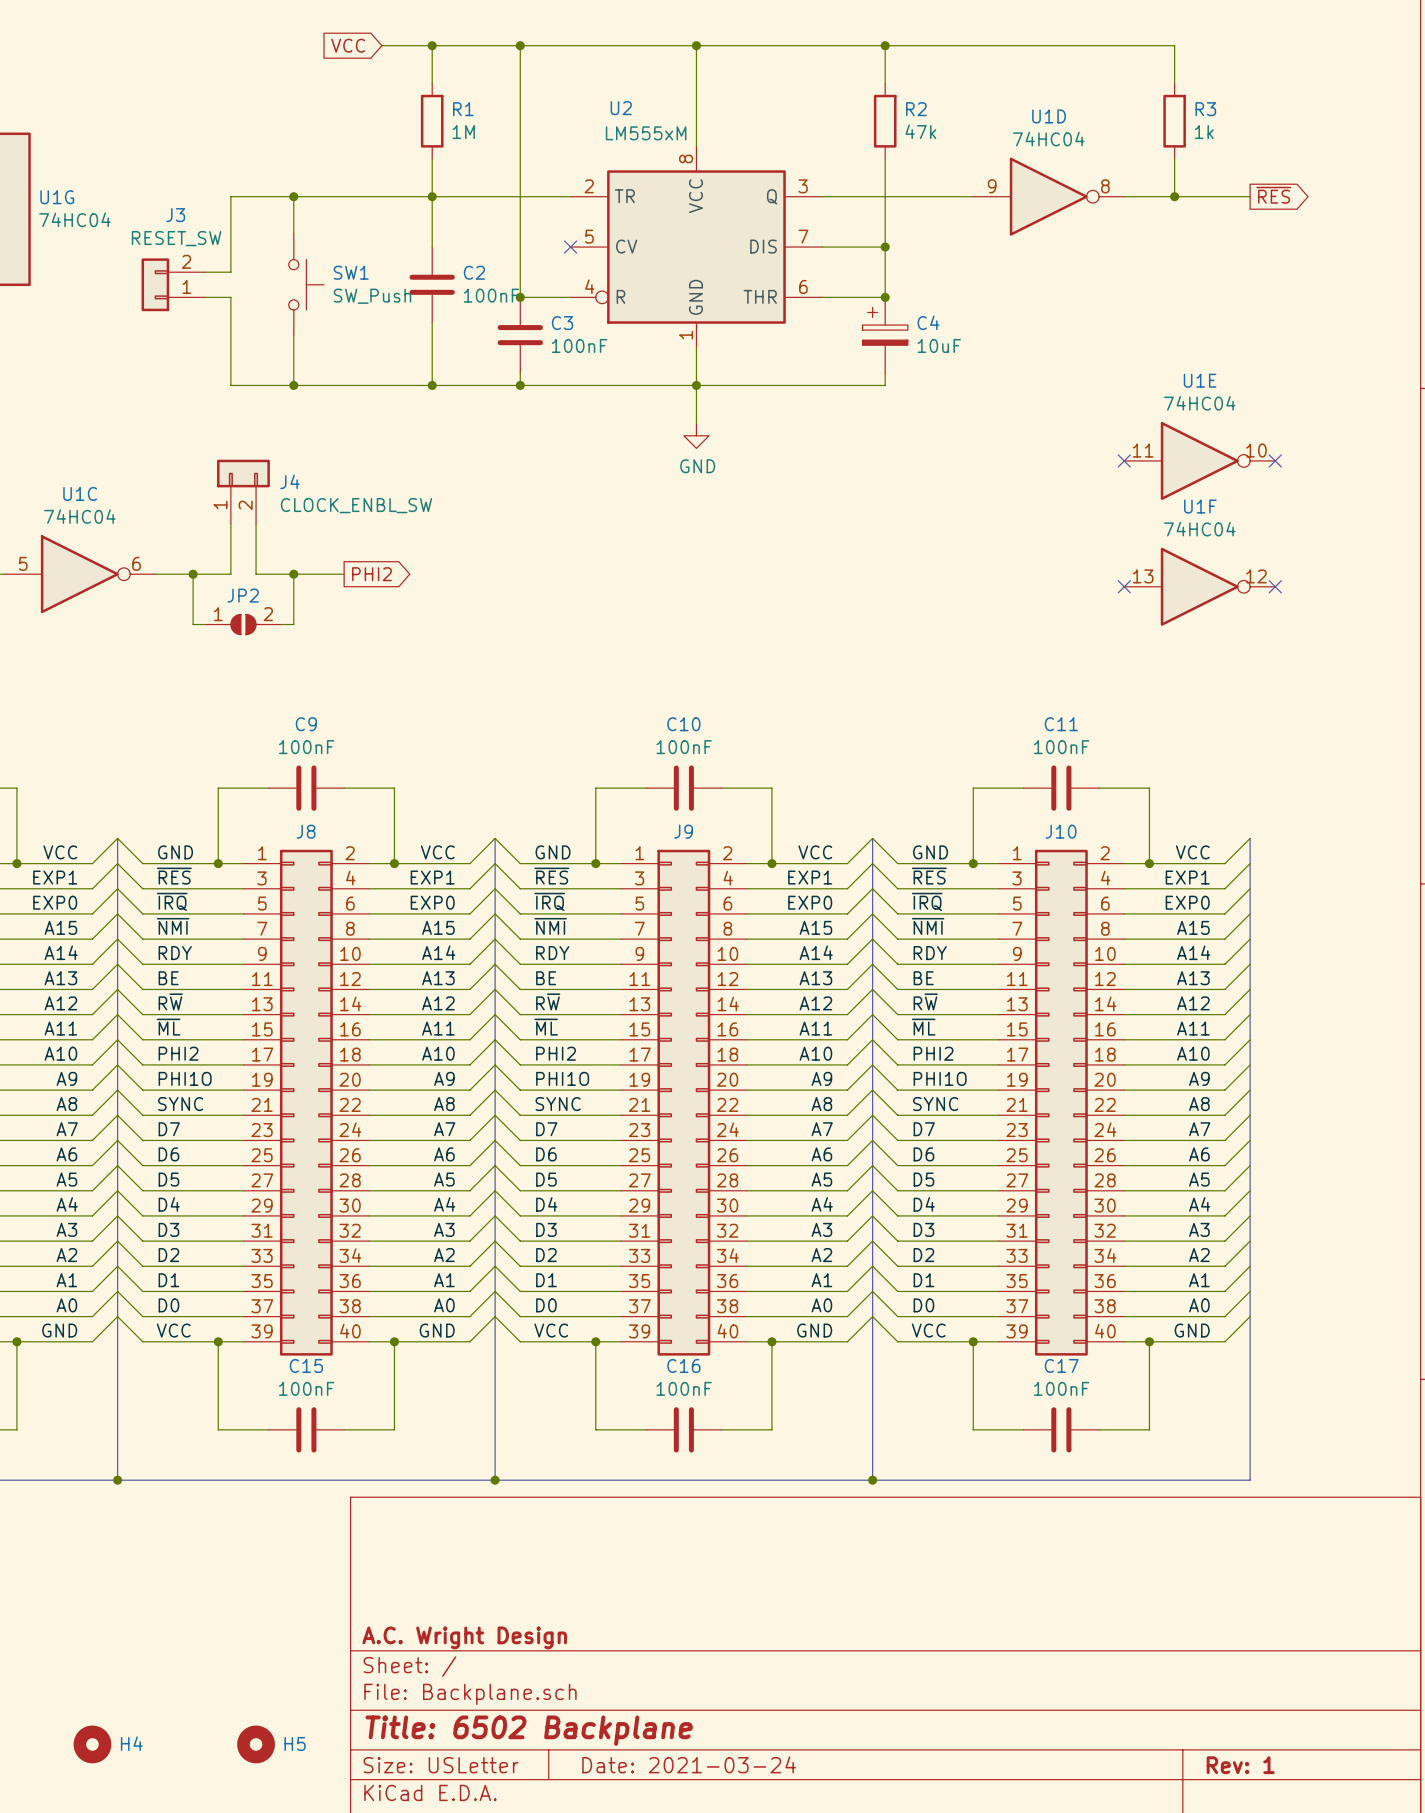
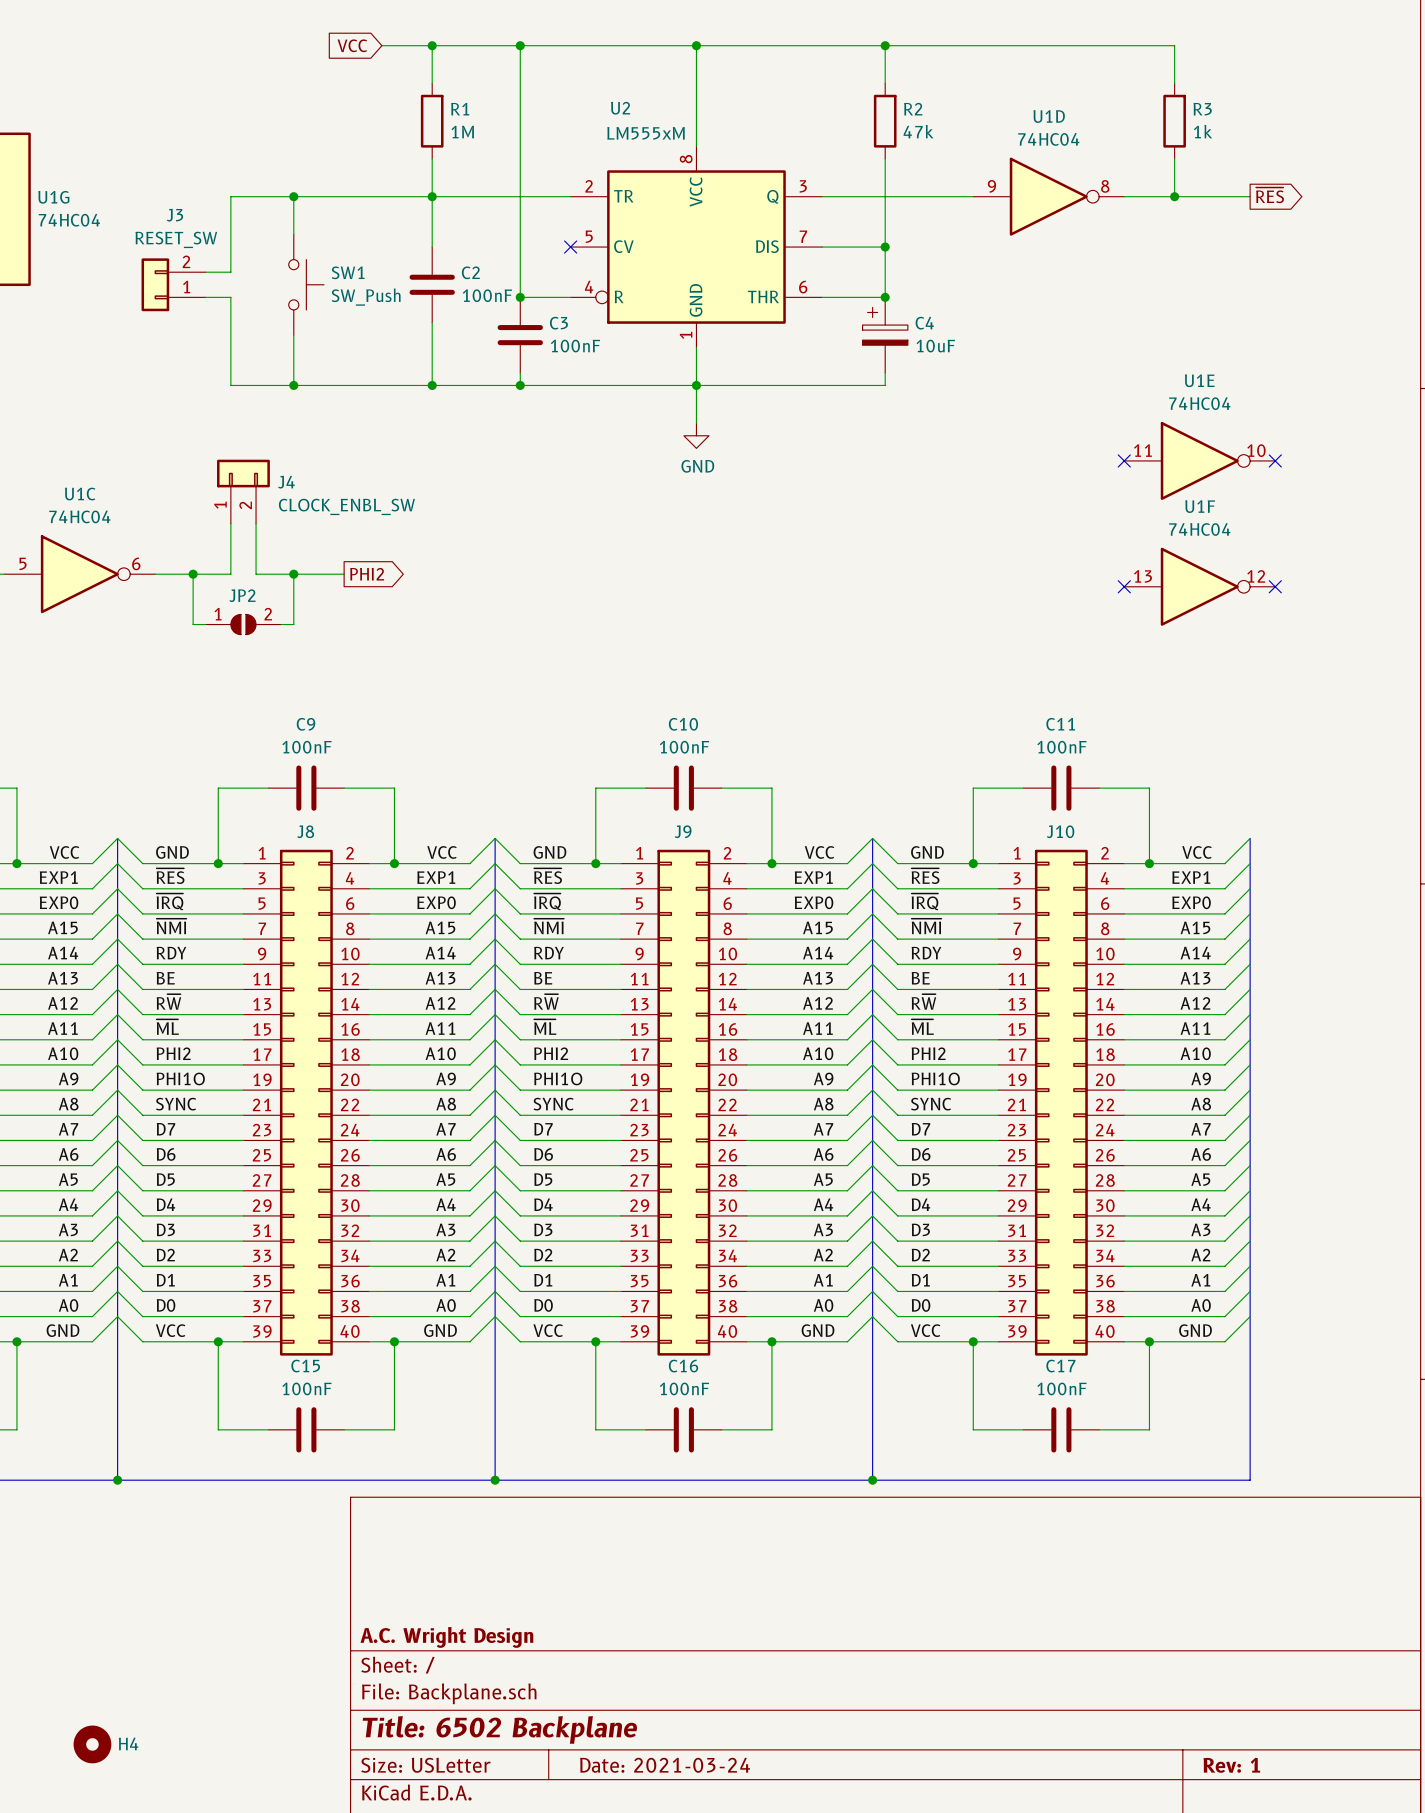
H5: (256, 1744) -> none

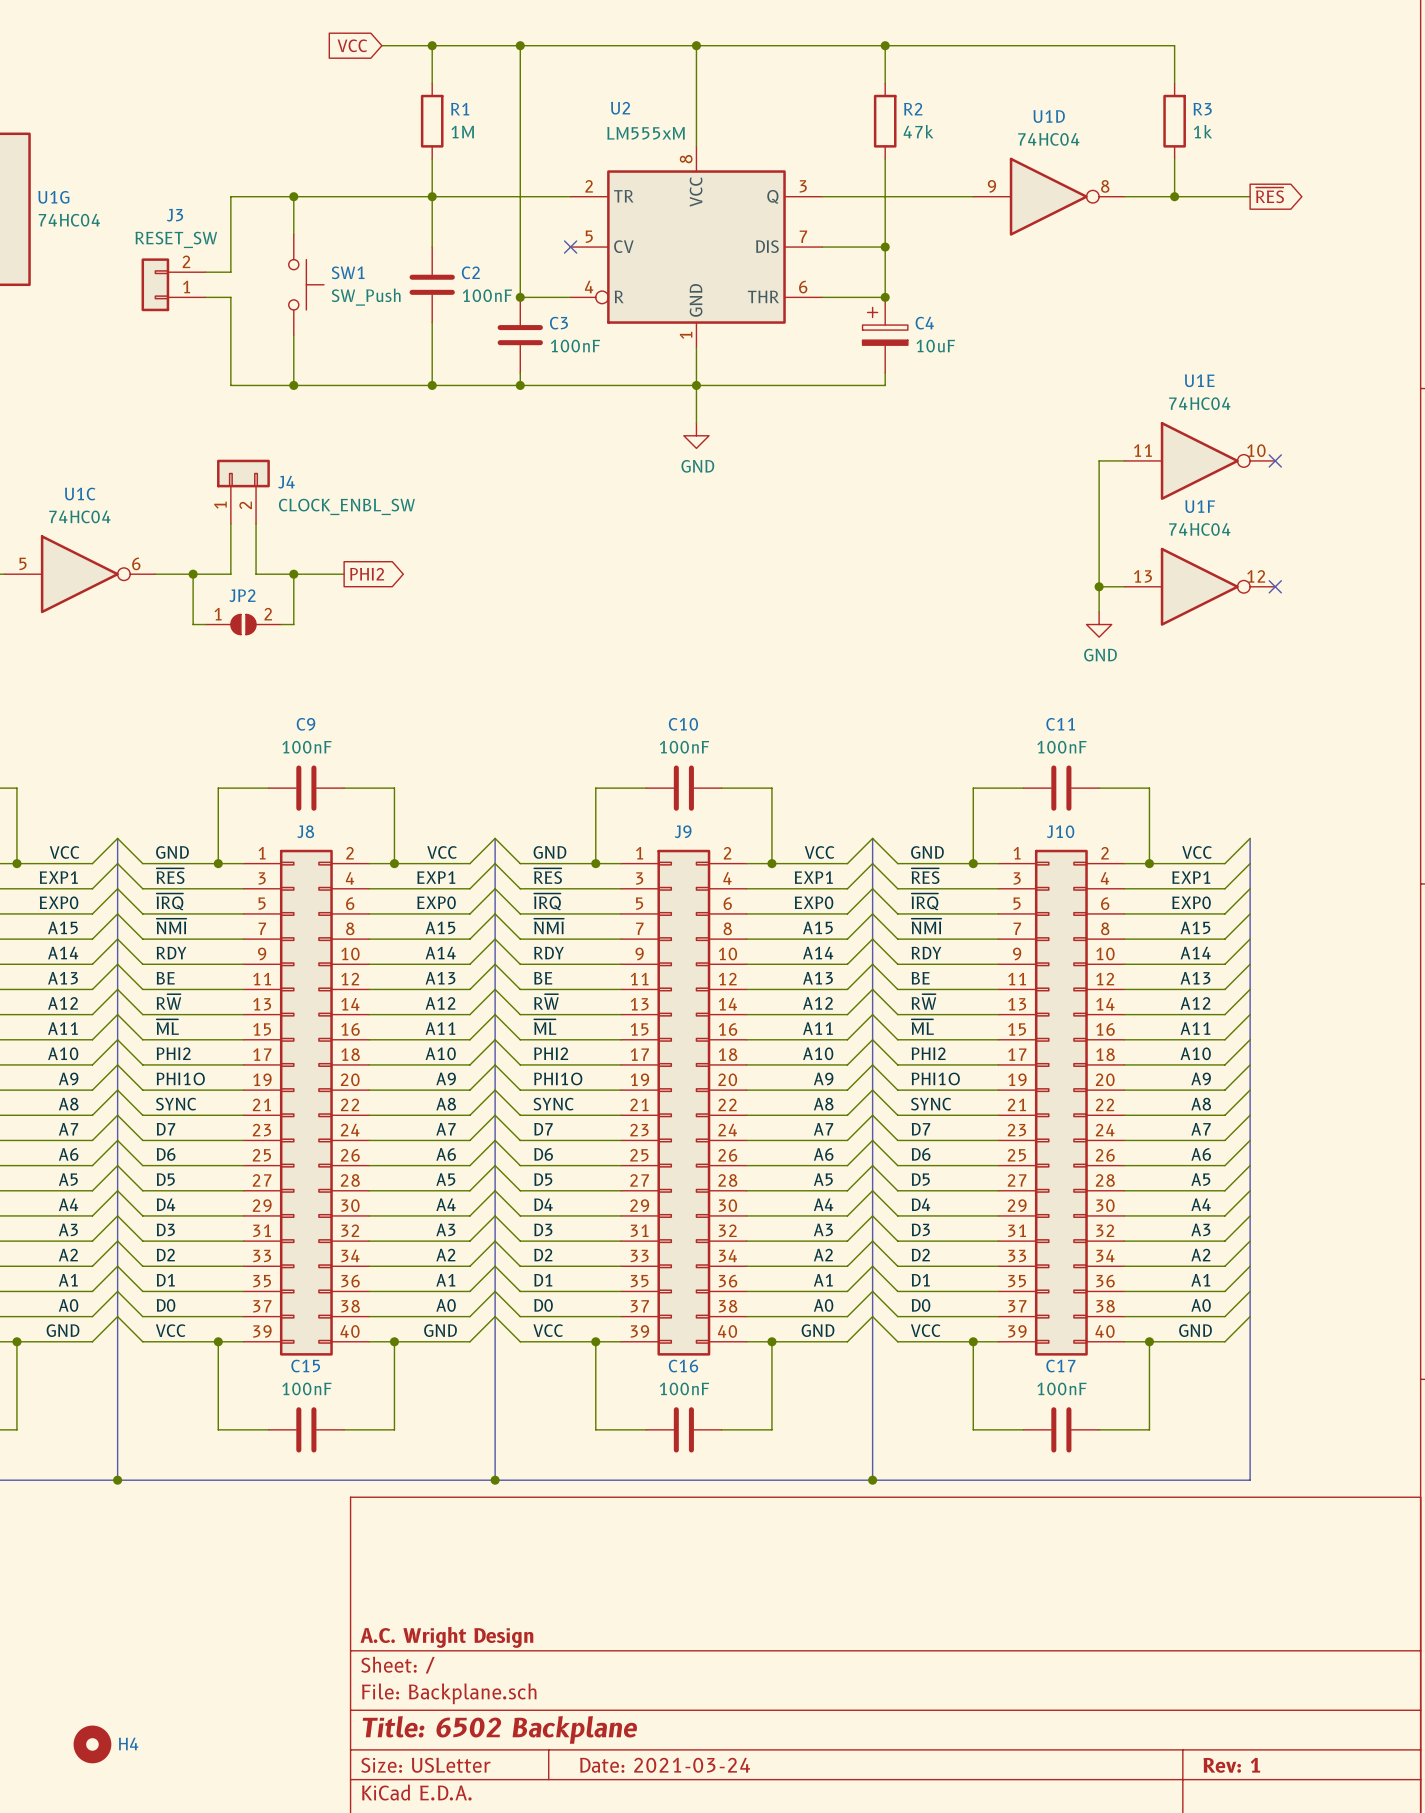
wire: none -> (1124, 460) (1099, 460) (1099, 611)
no-connect mark: (1124, 460) -> none
wire: none -> (1099, 586) (1124, 586)
junction: none -> (1099, 586)
no-connect mark: (1124, 586) -> none
power symbol: none -> GND (1099, 624)

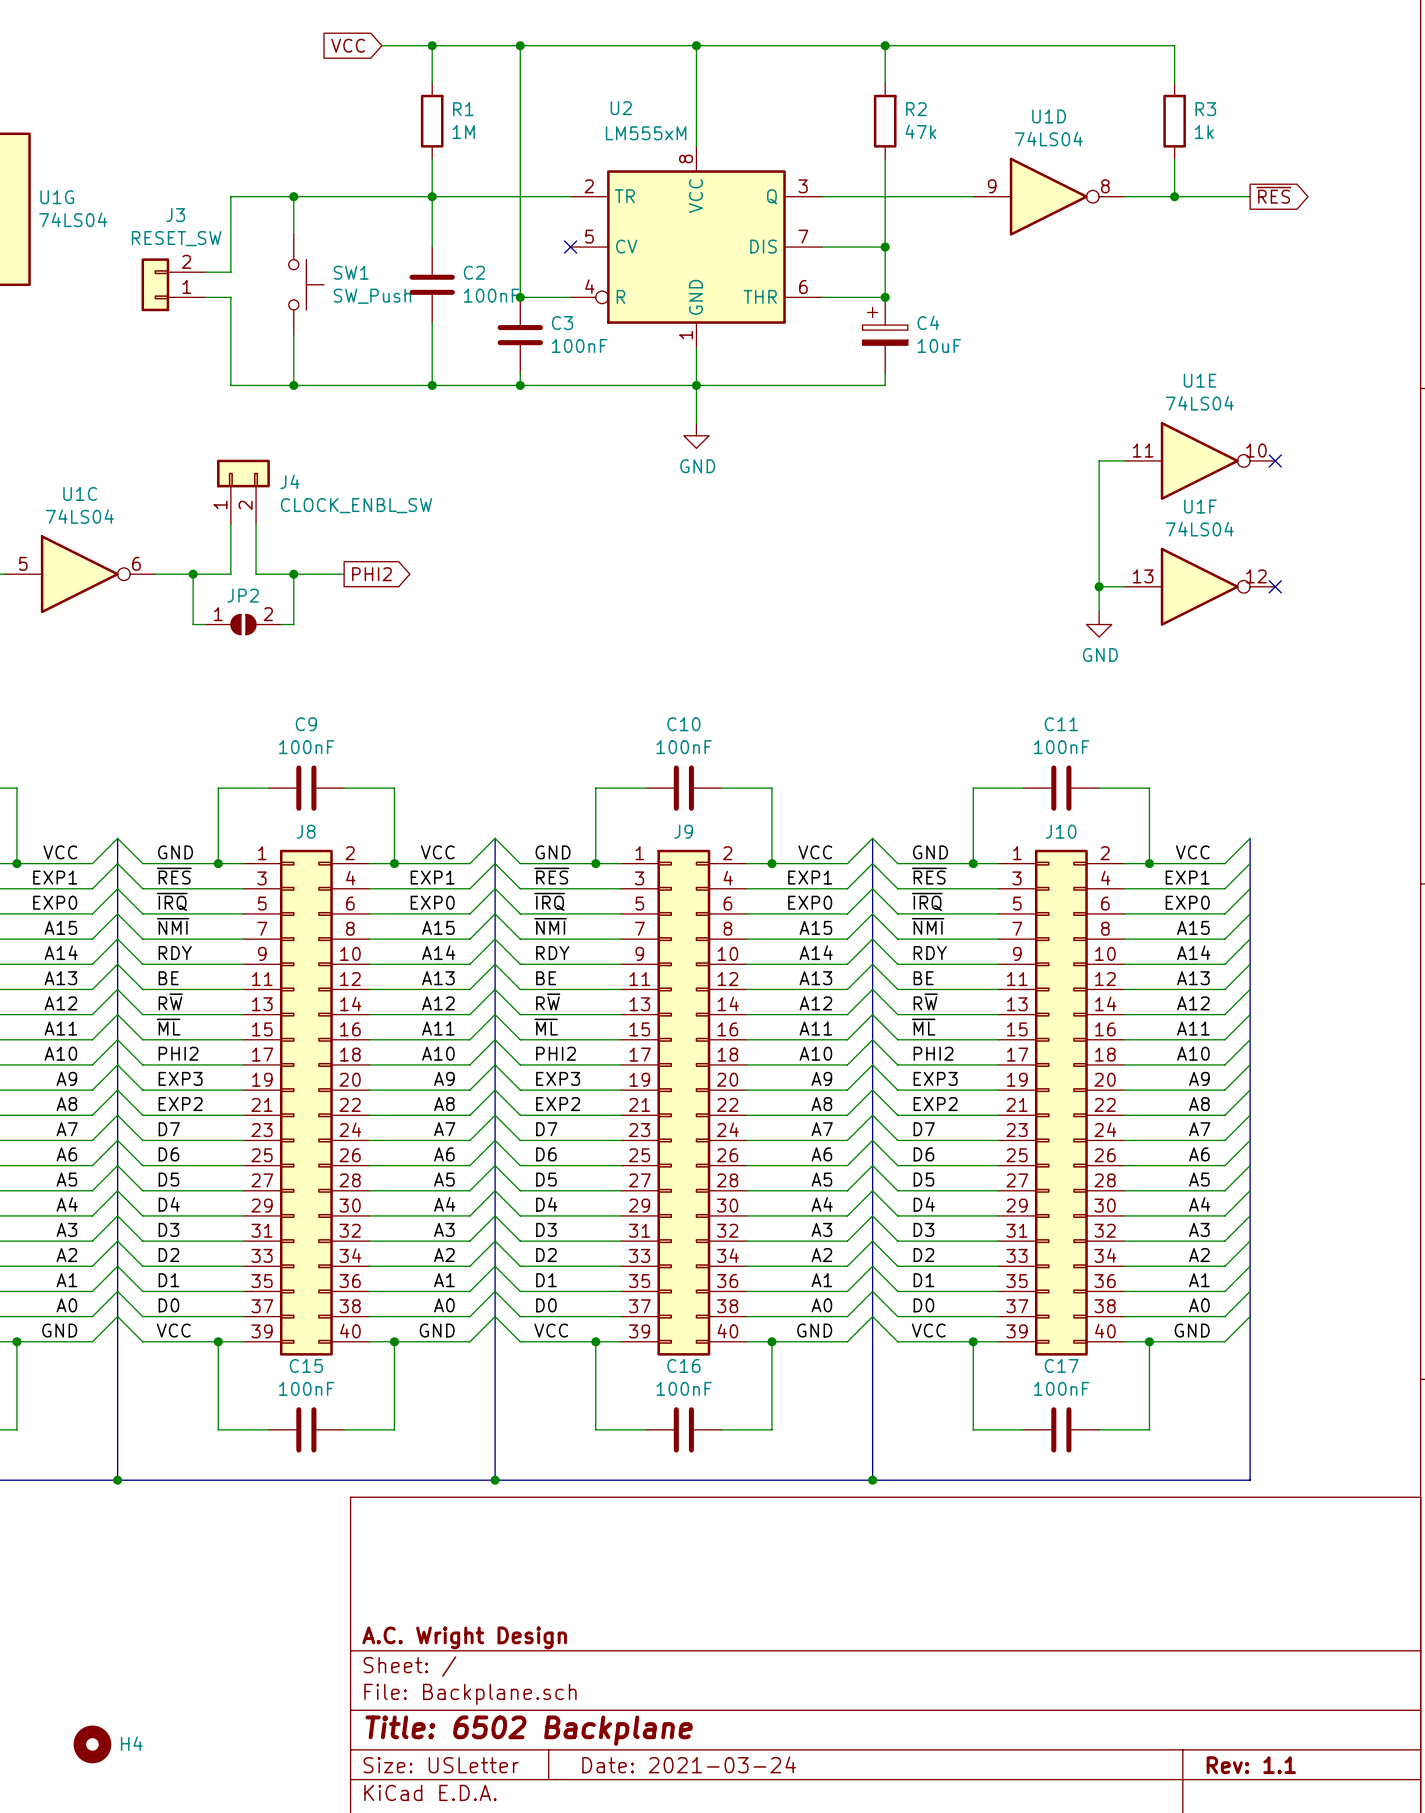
U1D value: 74HC04 (1048, 139) -> 74LS04 (1048, 139)
U1G value: 74HC04 (69, 220) -> 74LS04 (73, 219)
U1E value: 74HC04 (1199, 403) -> 74LS04 (1199, 403)
U1C value: 74HC04 (79, 516) -> 74LS04 (79, 516)
U1F value: 74HC04 (1199, 529) -> 74LS04 (1199, 529)
label: PHI1O (180, 1078) -> EXP3 (180, 1078)
label: PHI1O (558, 1078) -> EXP3 (558, 1078)
label: PHI1O (935, 1078) -> EXP3 (935, 1078)
label: SYNC (176, 1104) -> EXP2 (180, 1104)
label: SYNC (553, 1104) -> EXP2 (558, 1104)
label: SYNC (931, 1104) -> EXP2 (935, 1104)
title block: Rev: 1 (1231, 1765) -> Rev: 1.1 (1251, 1765)

